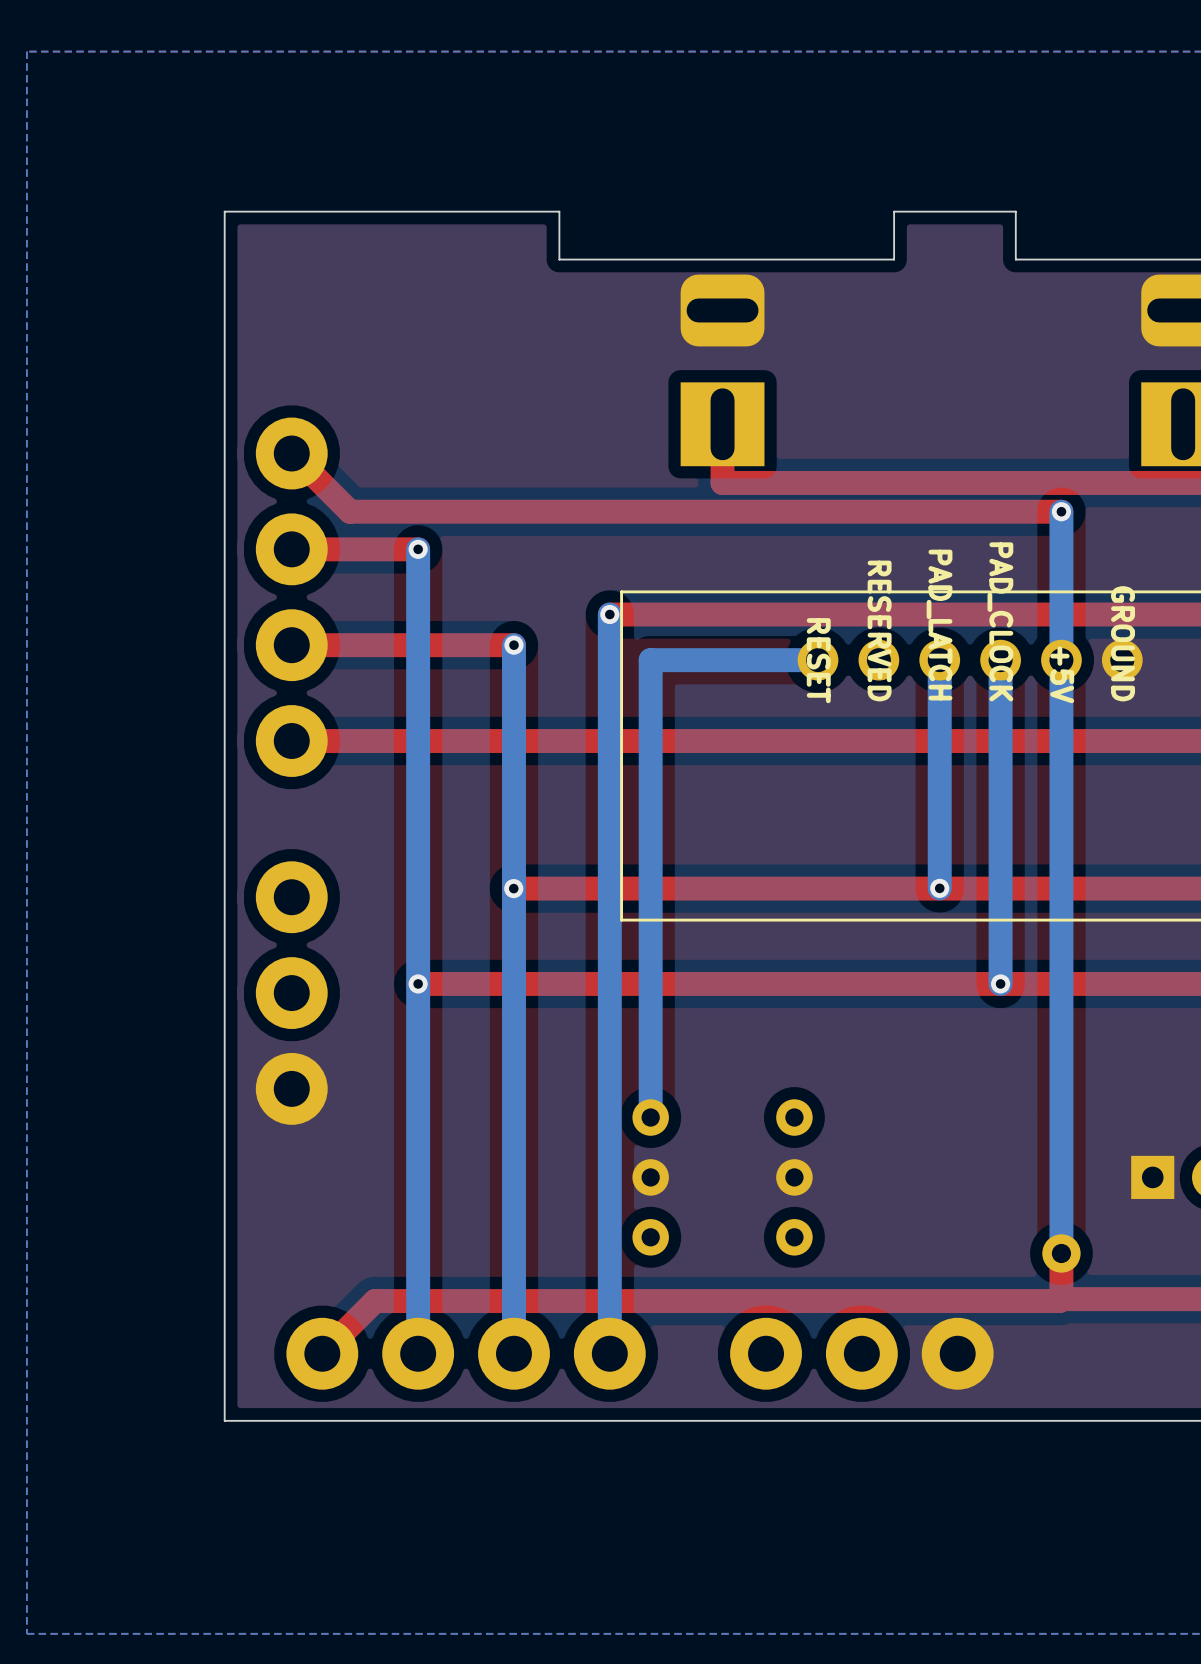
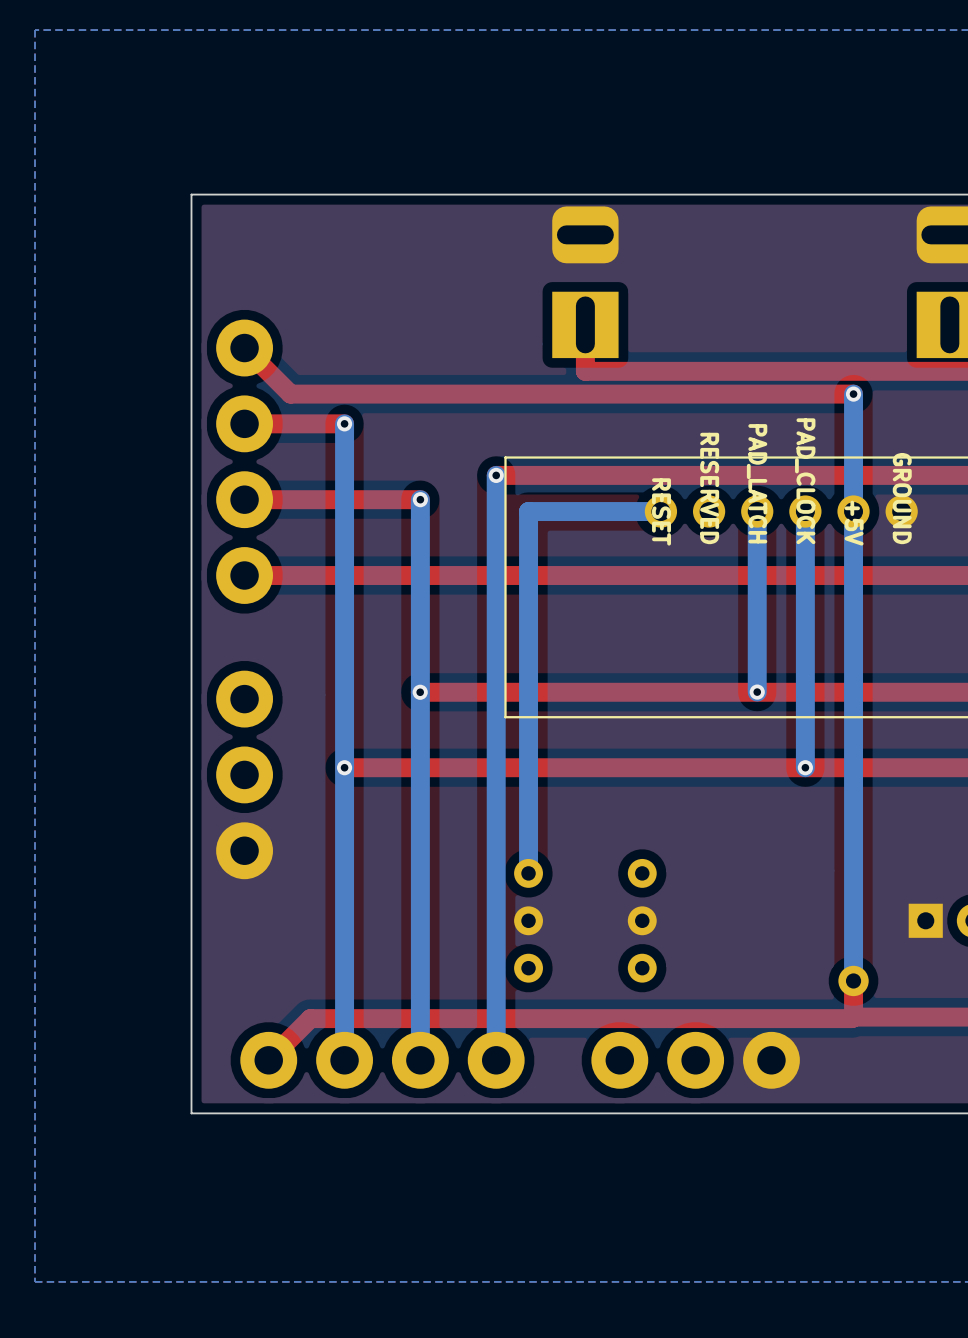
board edge: (559, 259) (559, 211) (224, 211) (224, 259) -> (456, 194) (191, 194)
board edge: (1015, 259) (1015, 211) (894, 211) (894, 259) -> (817, 194) (721, 194)

